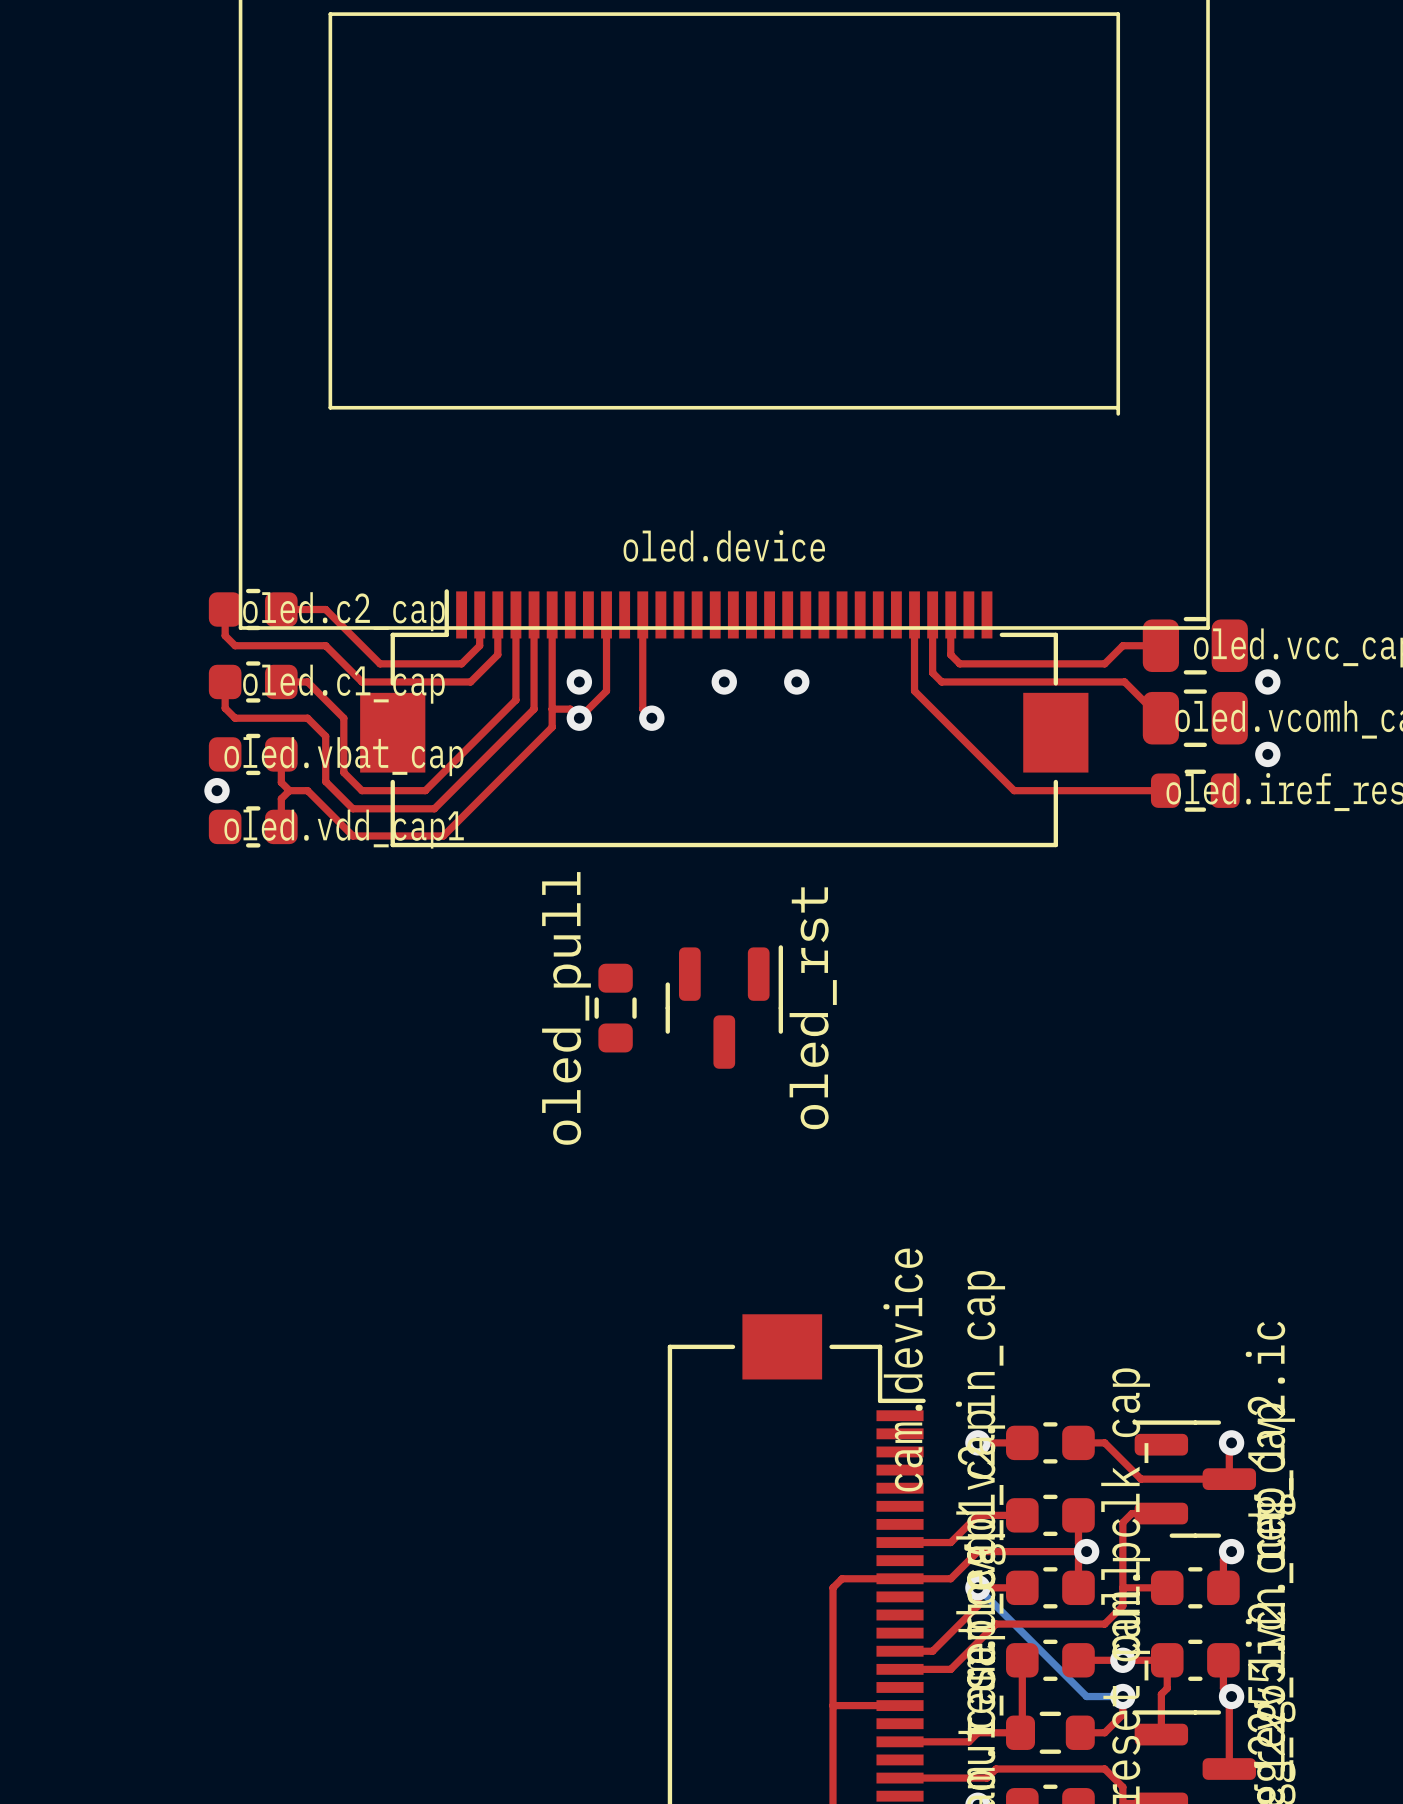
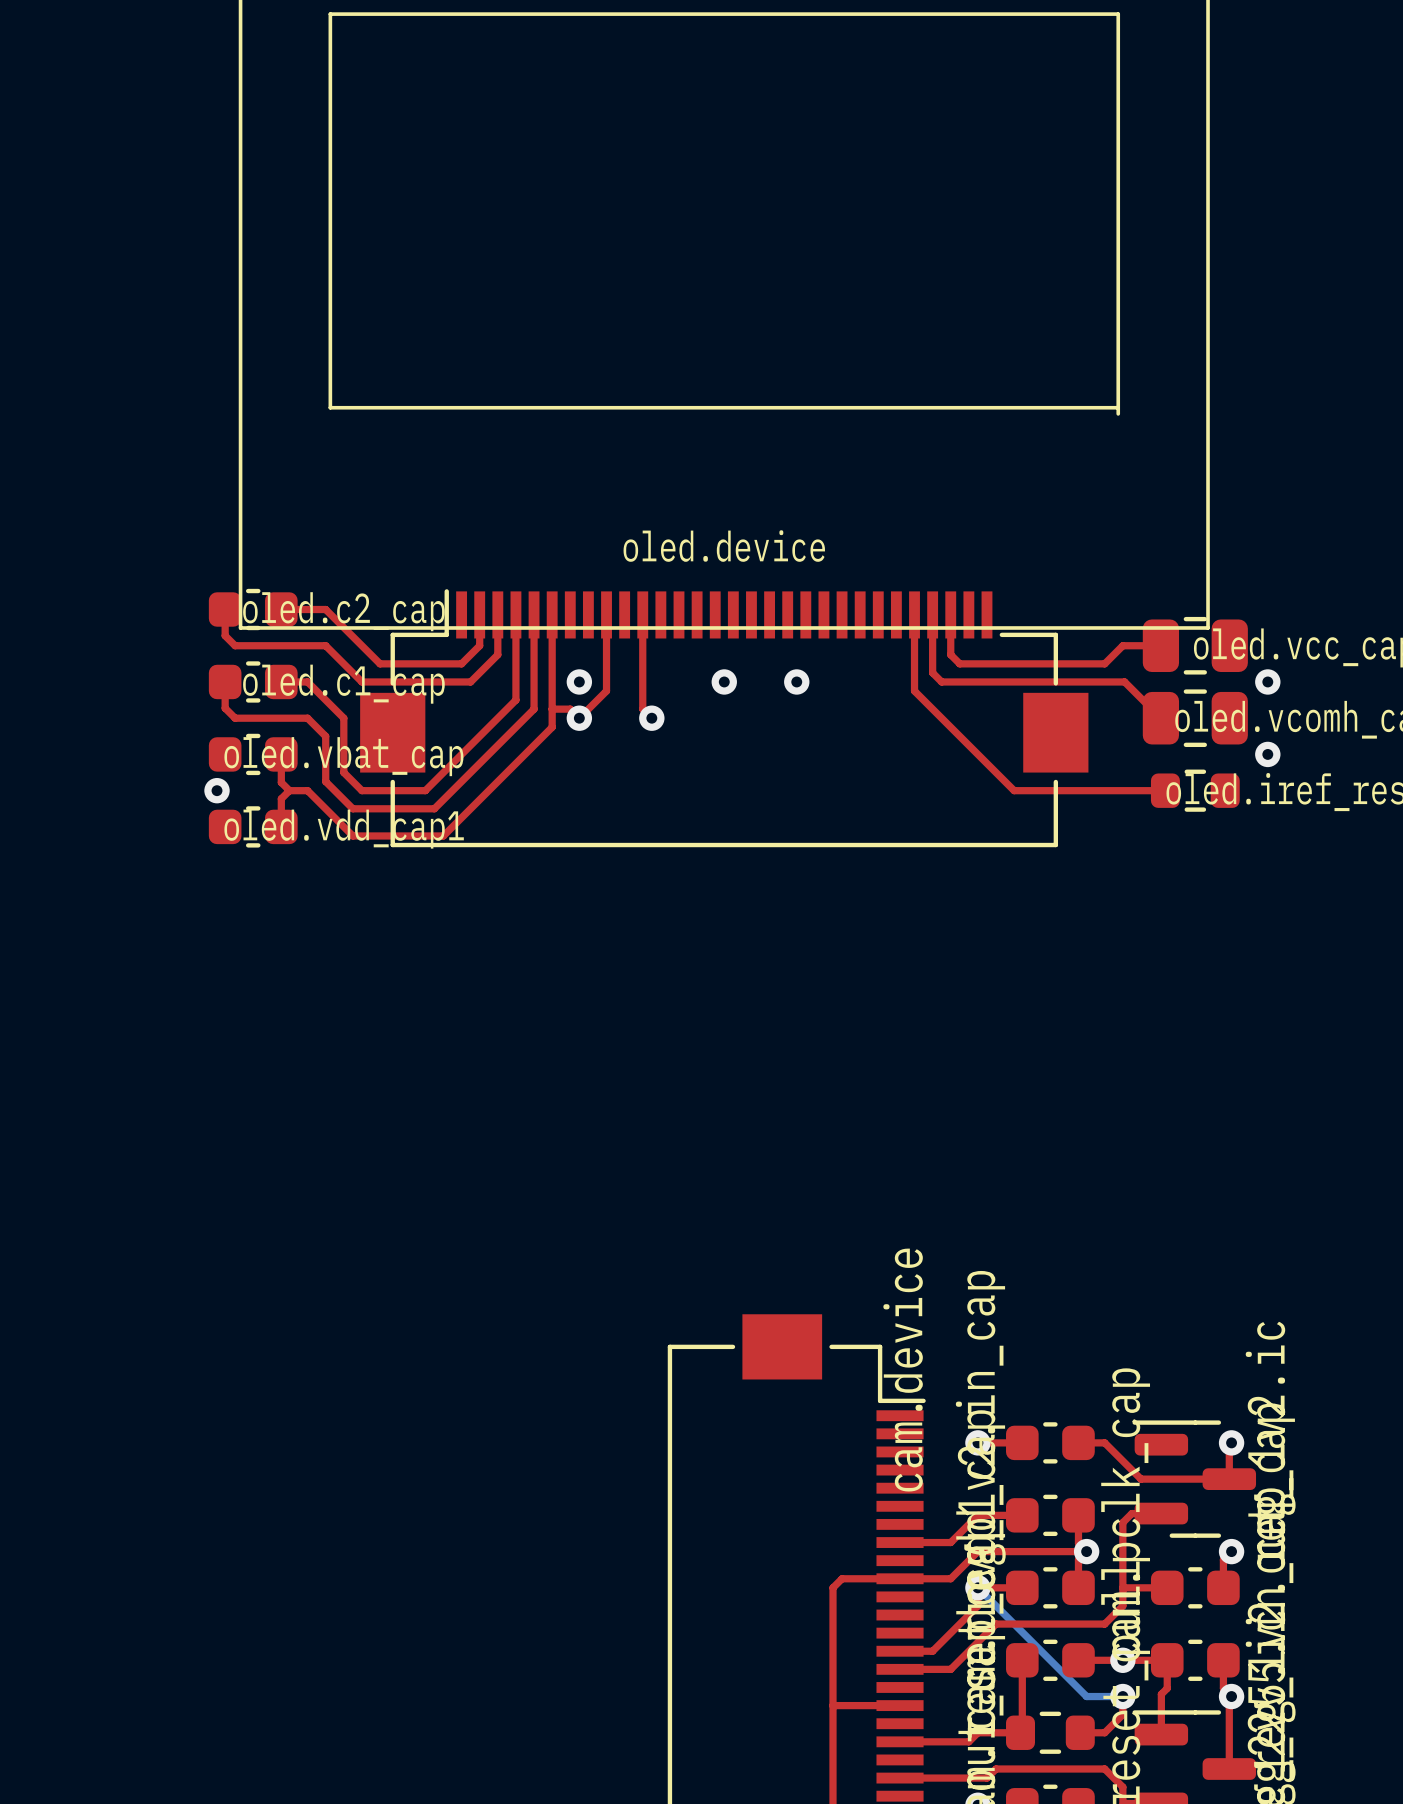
oled_rst: (724, 1006) -> none
oled_pull: (615, 1008) -> none

